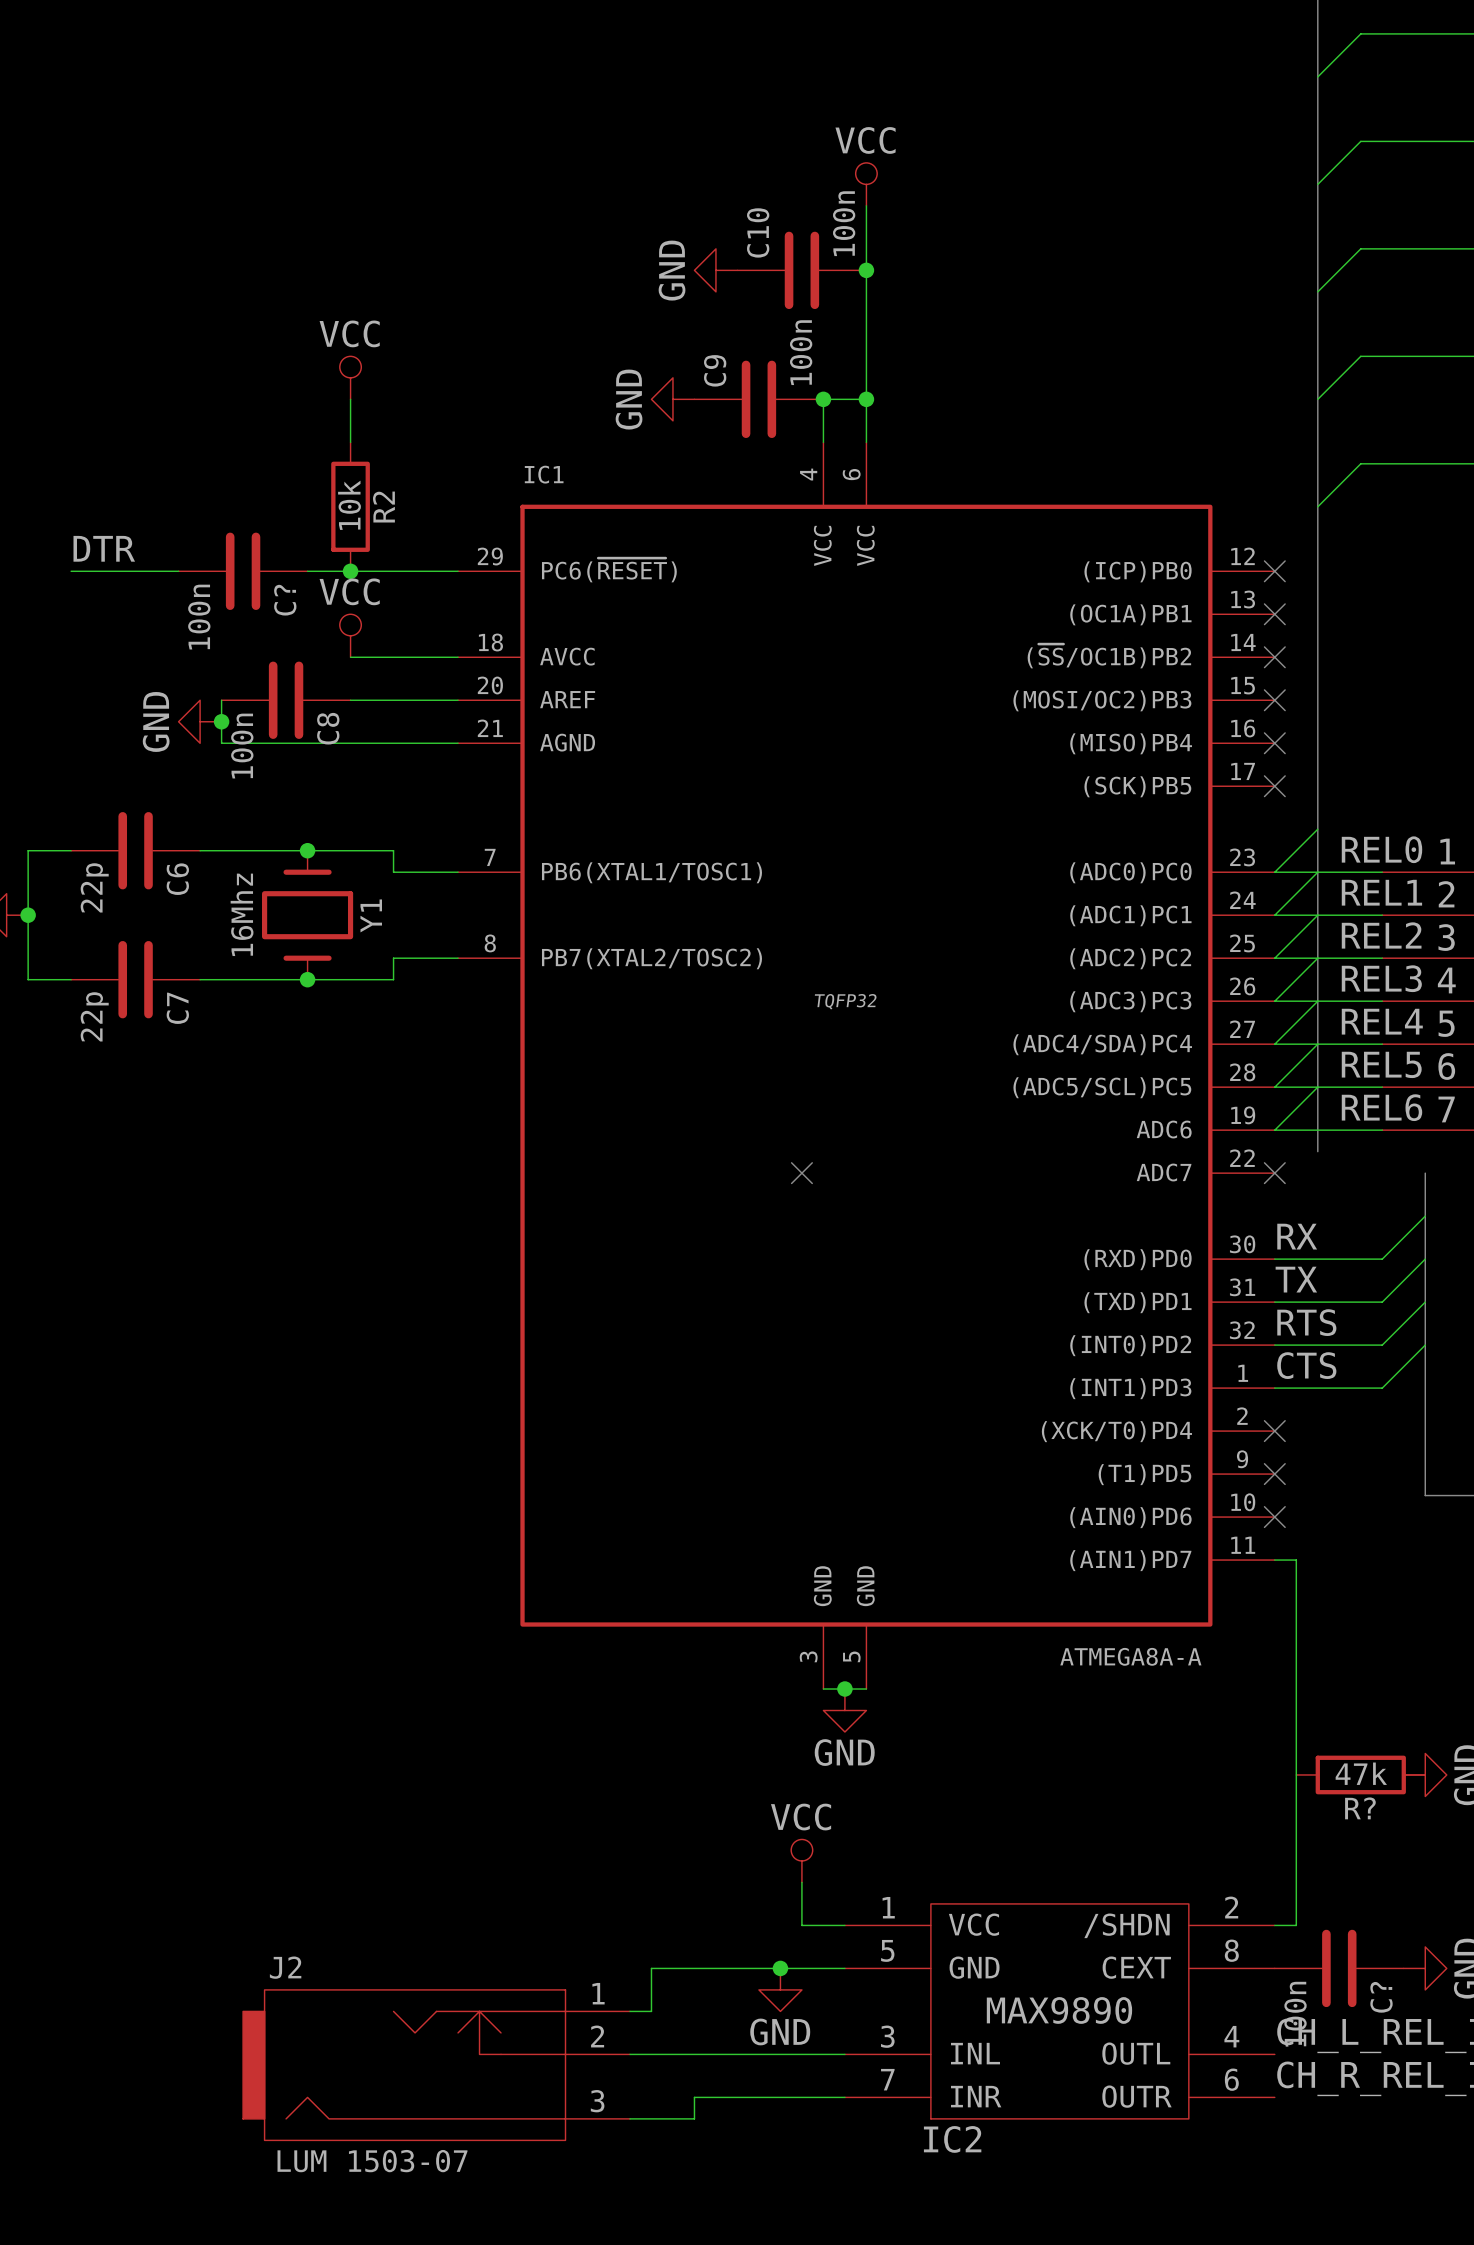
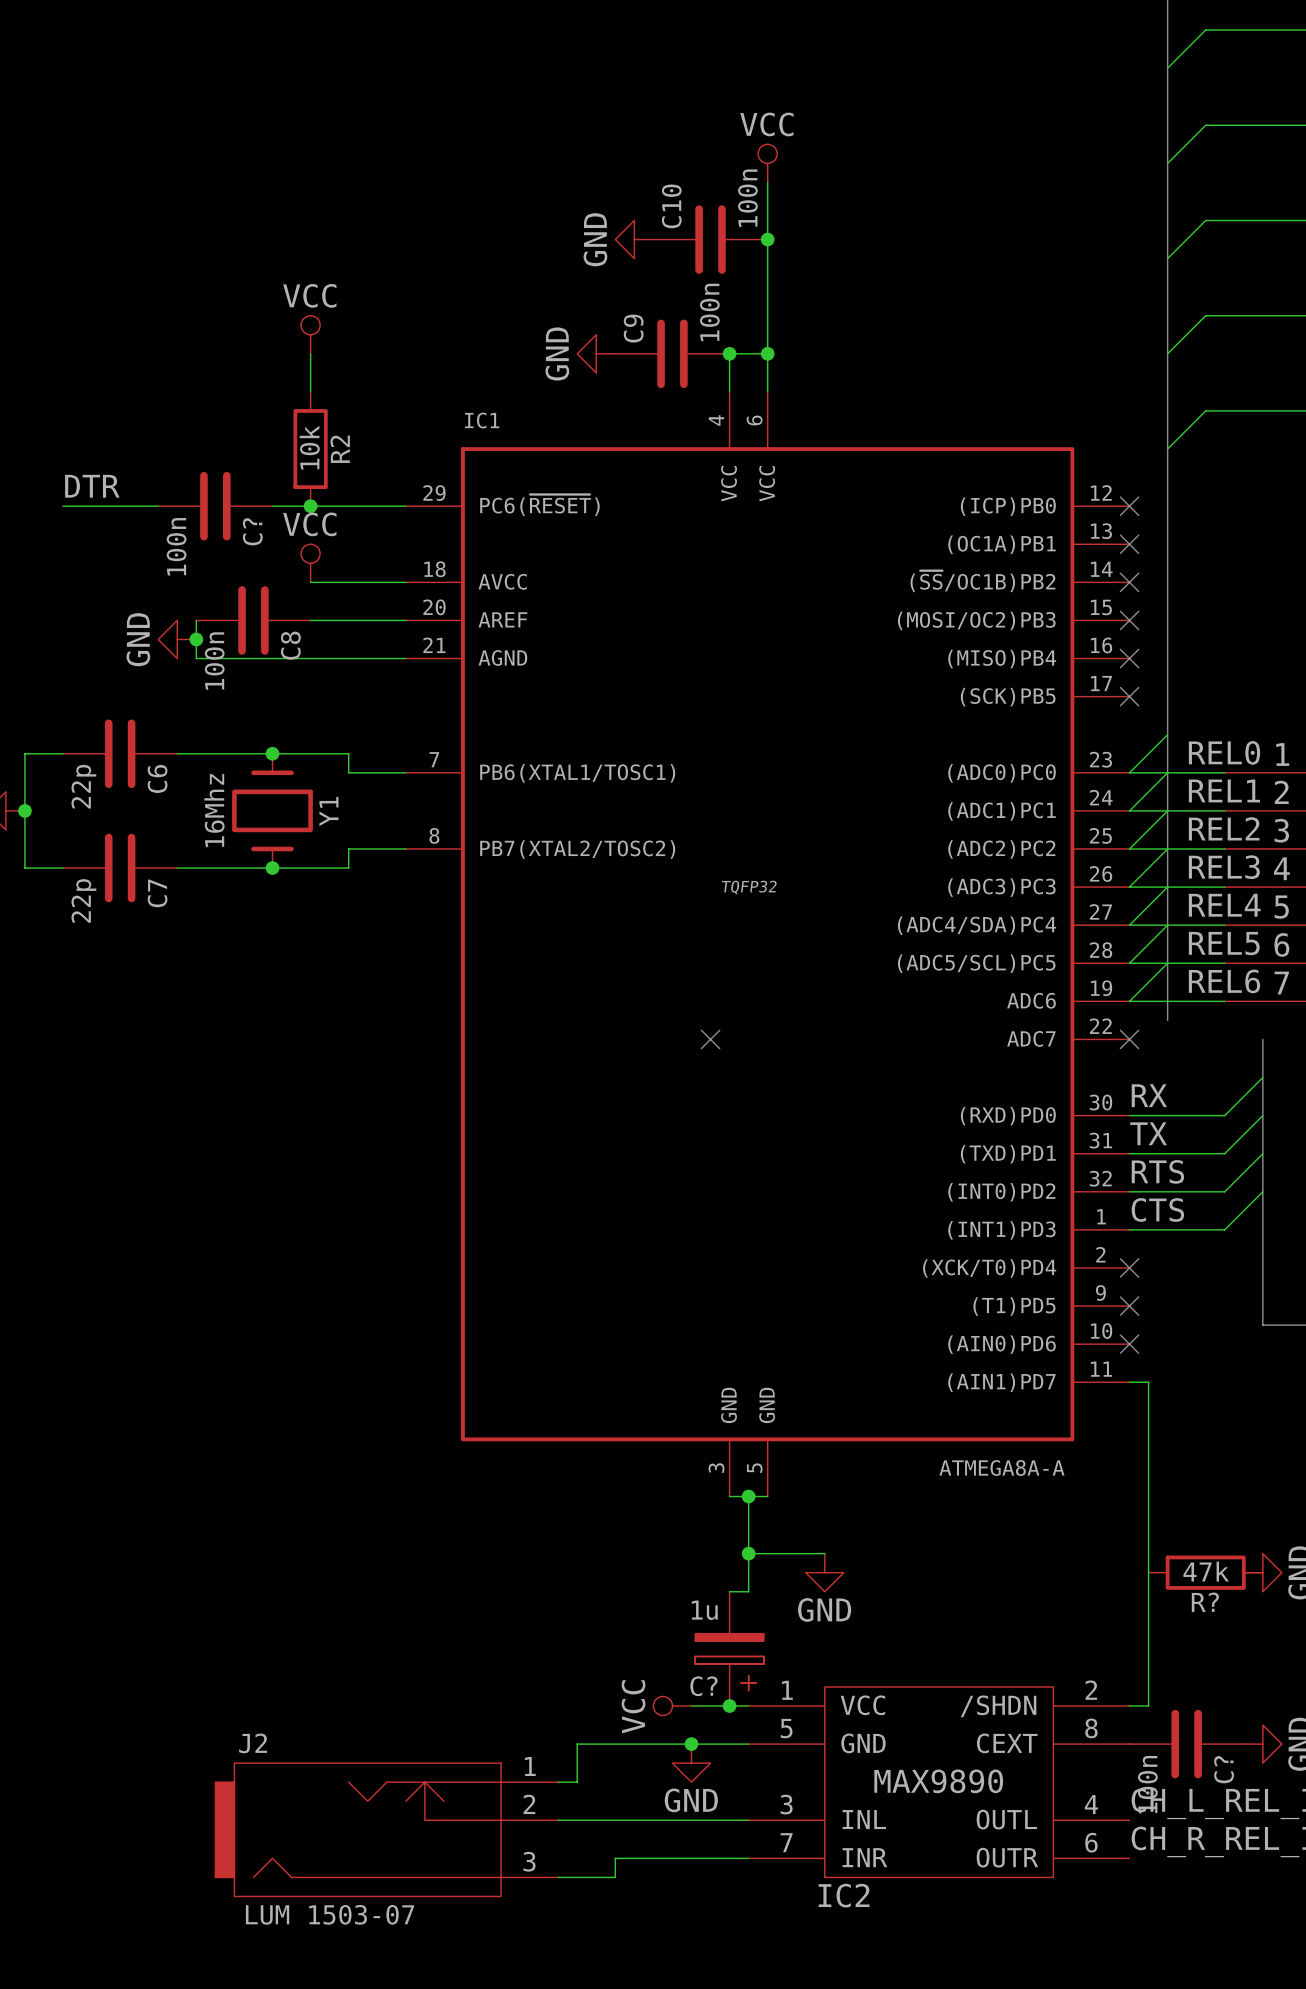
wire: none -> (748, 1496) (748, 1591) (729, 1591)
power symbol position: GND (844, 1710) -> GND (824, 1572)
wire: none -> (748, 1553) (824, 1553)
junction: none -> (748, 1553)
power symbol rotation: 0° (801, 1860) -> 90° counterclockwise (672, 1706)
power symbol position: VCC (801, 1860) -> VCC (672, 1706)
C?: none -> 1u (729, 1648)
wire: (801, 1882) (801, 1925) -> (691, 1706) (710, 1706)
junction: none -> (729, 1706)

